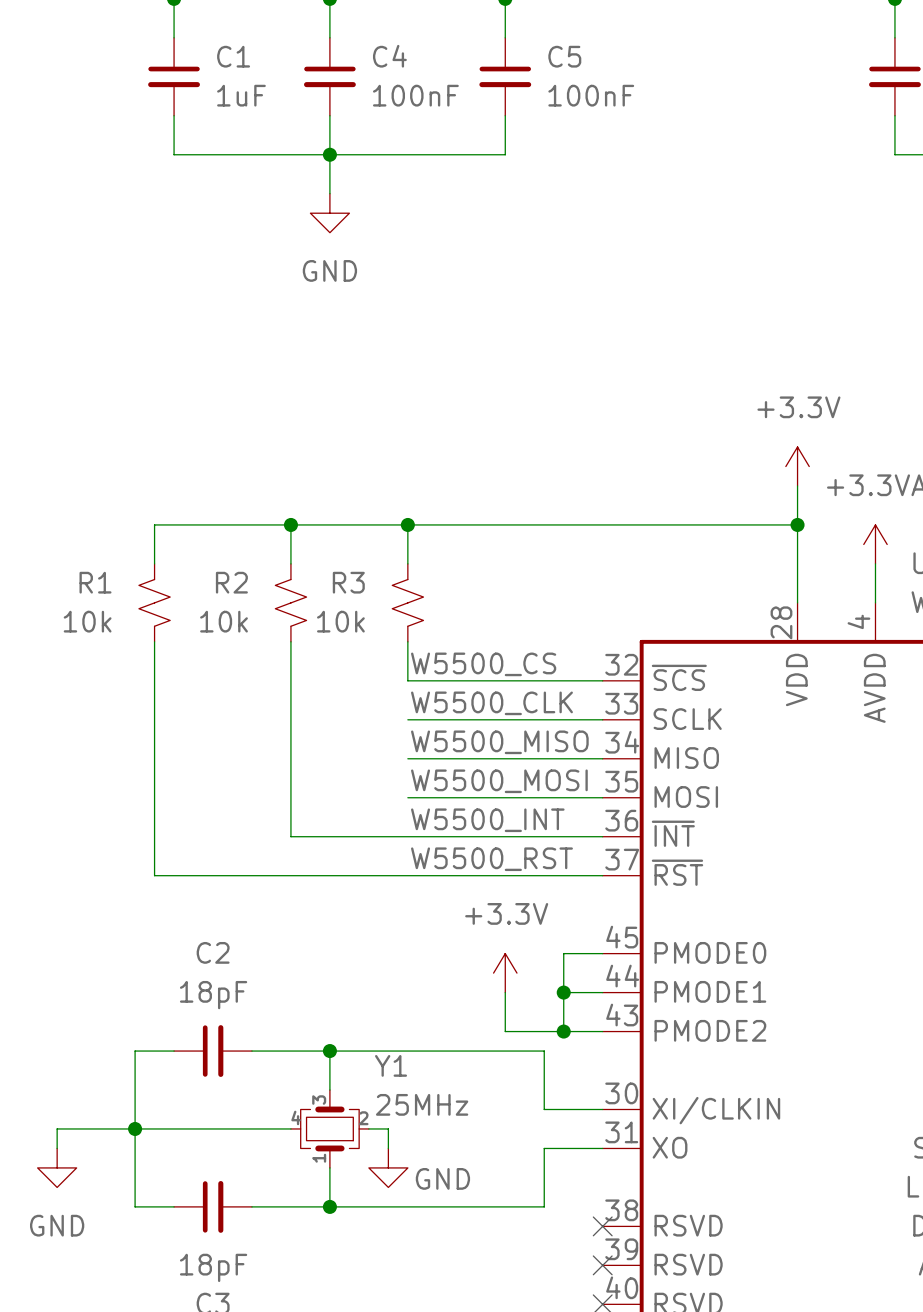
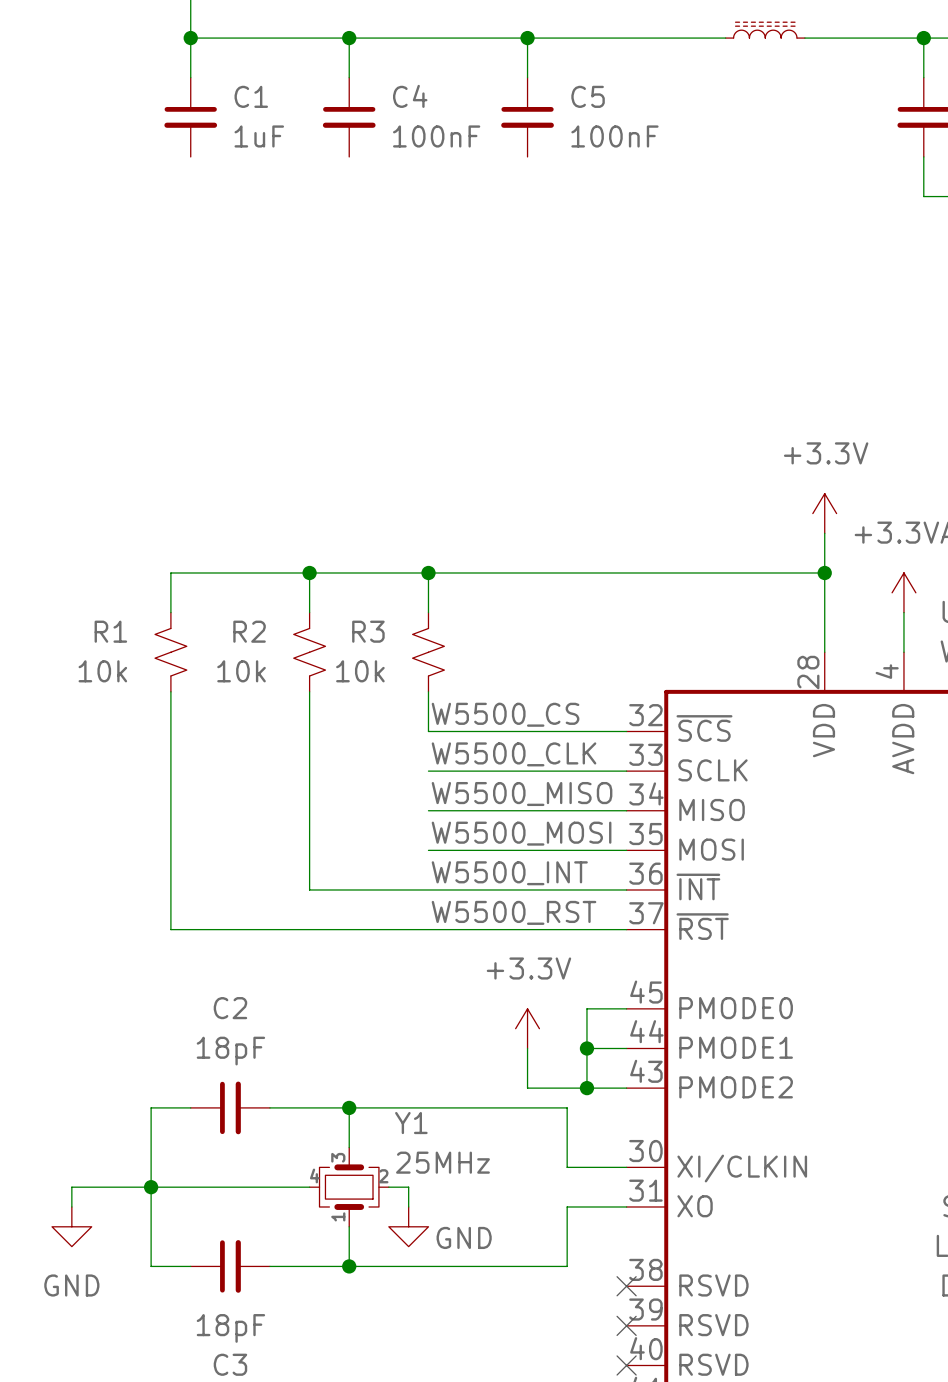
wire: (174, 115) (174, 154) (505, 154) (505, 115) -> none
wire: (329, 115) (329, 193) -> none
junction: (329, 154) -> none
power symbol: GND (329, 213) -> none

